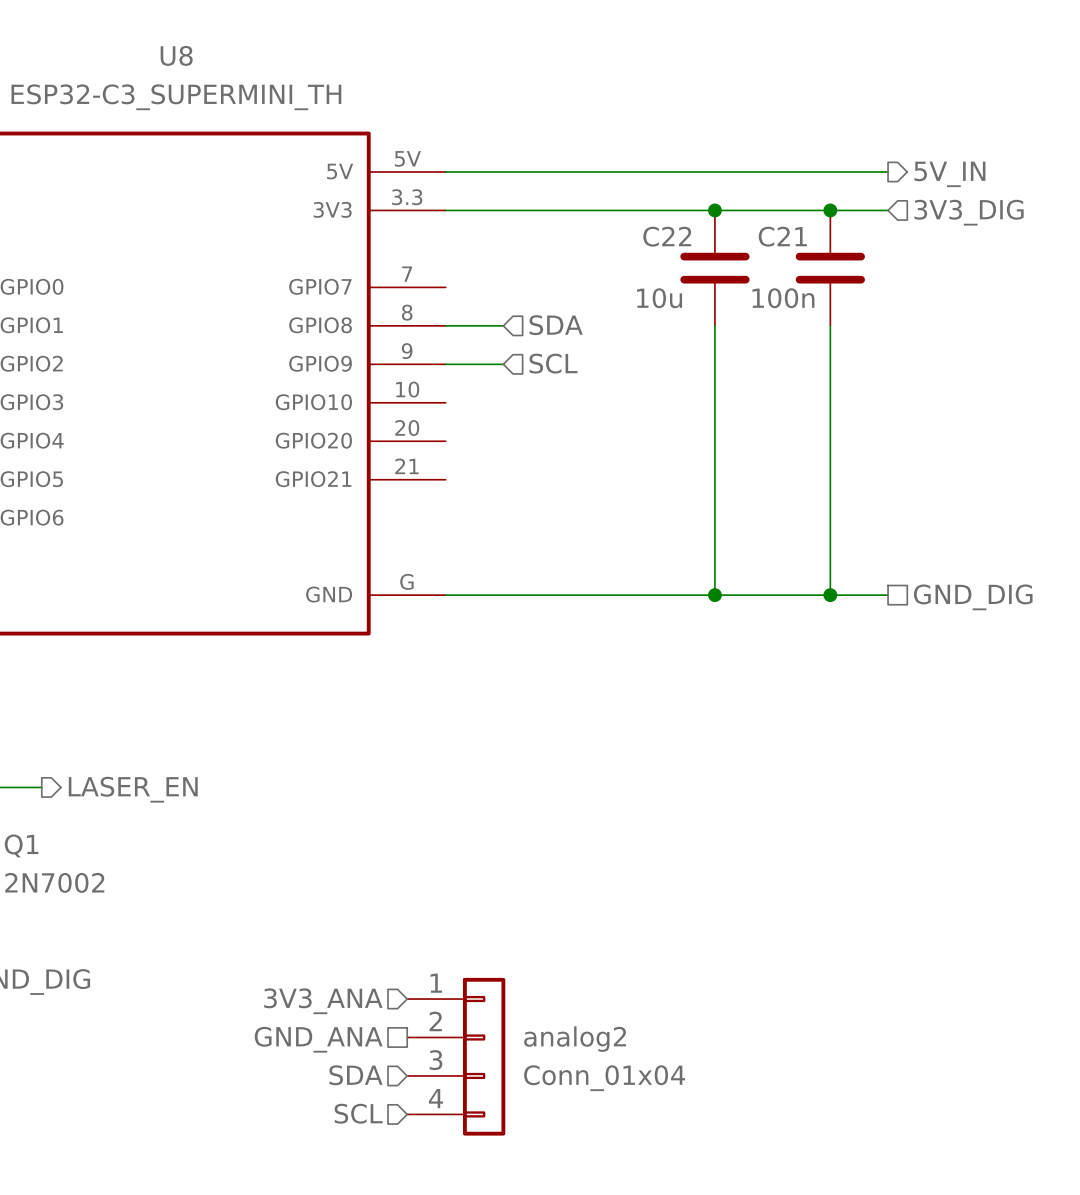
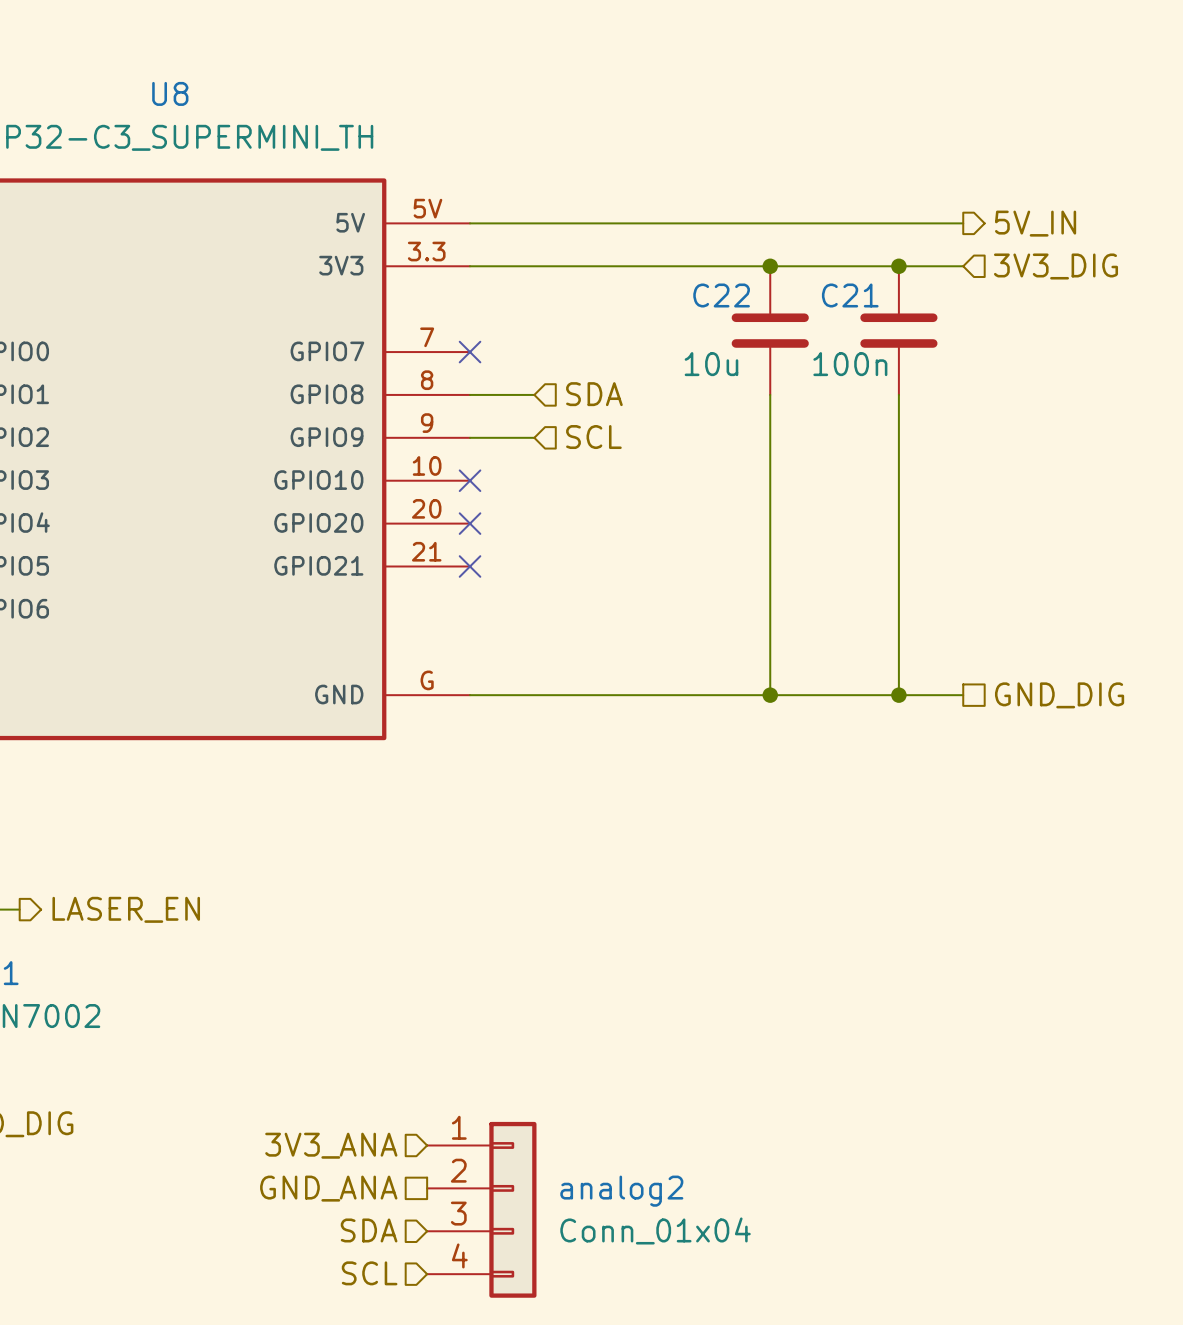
no-connect mark: none -> (470, 352)
no-connect mark: none -> (470, 480)
no-connect mark: none -> (470, 523)
no-connect mark: none -> (470, 566)

